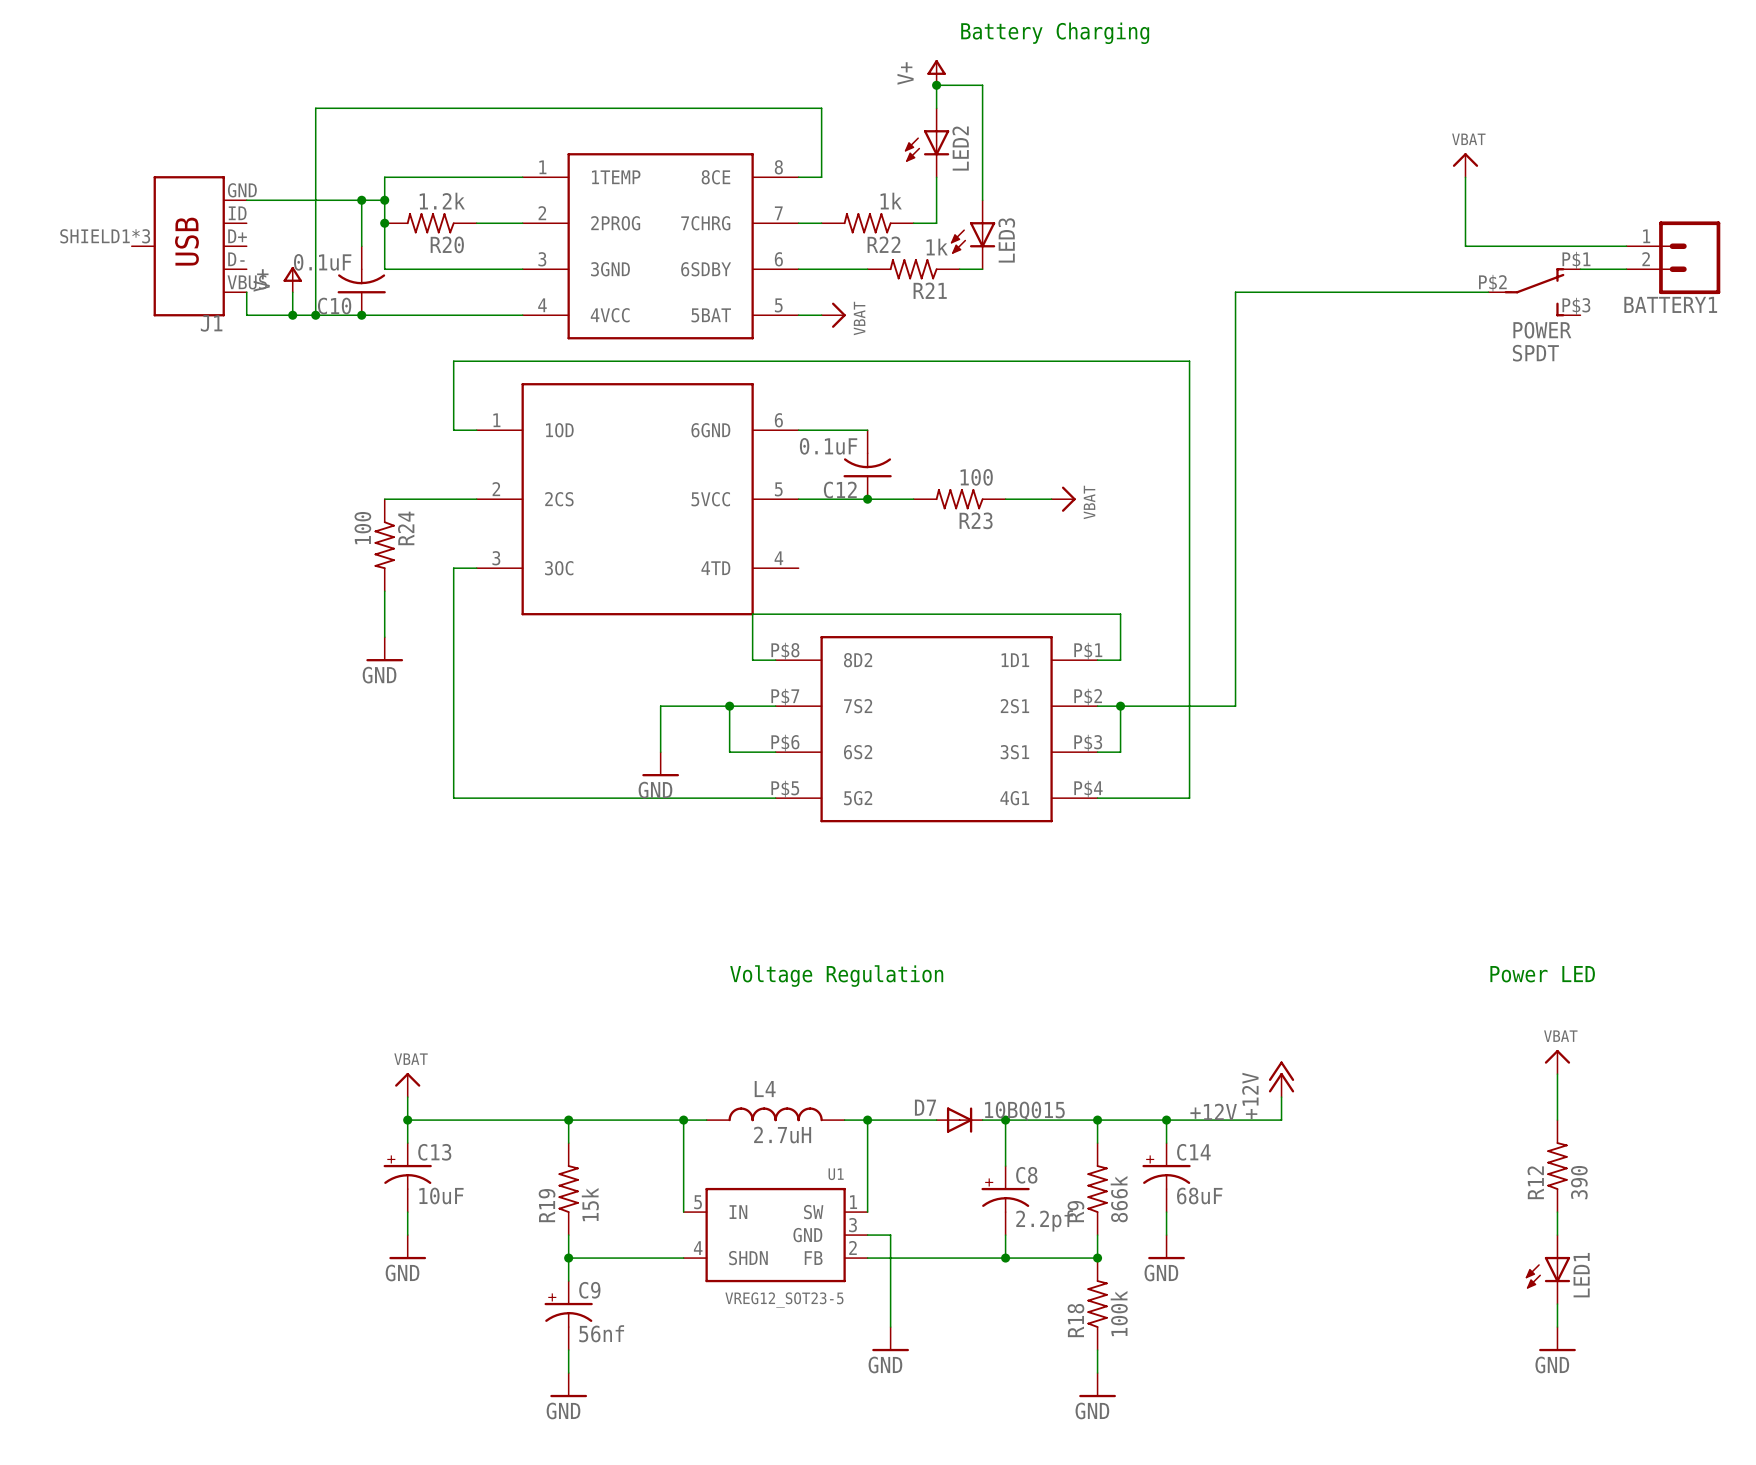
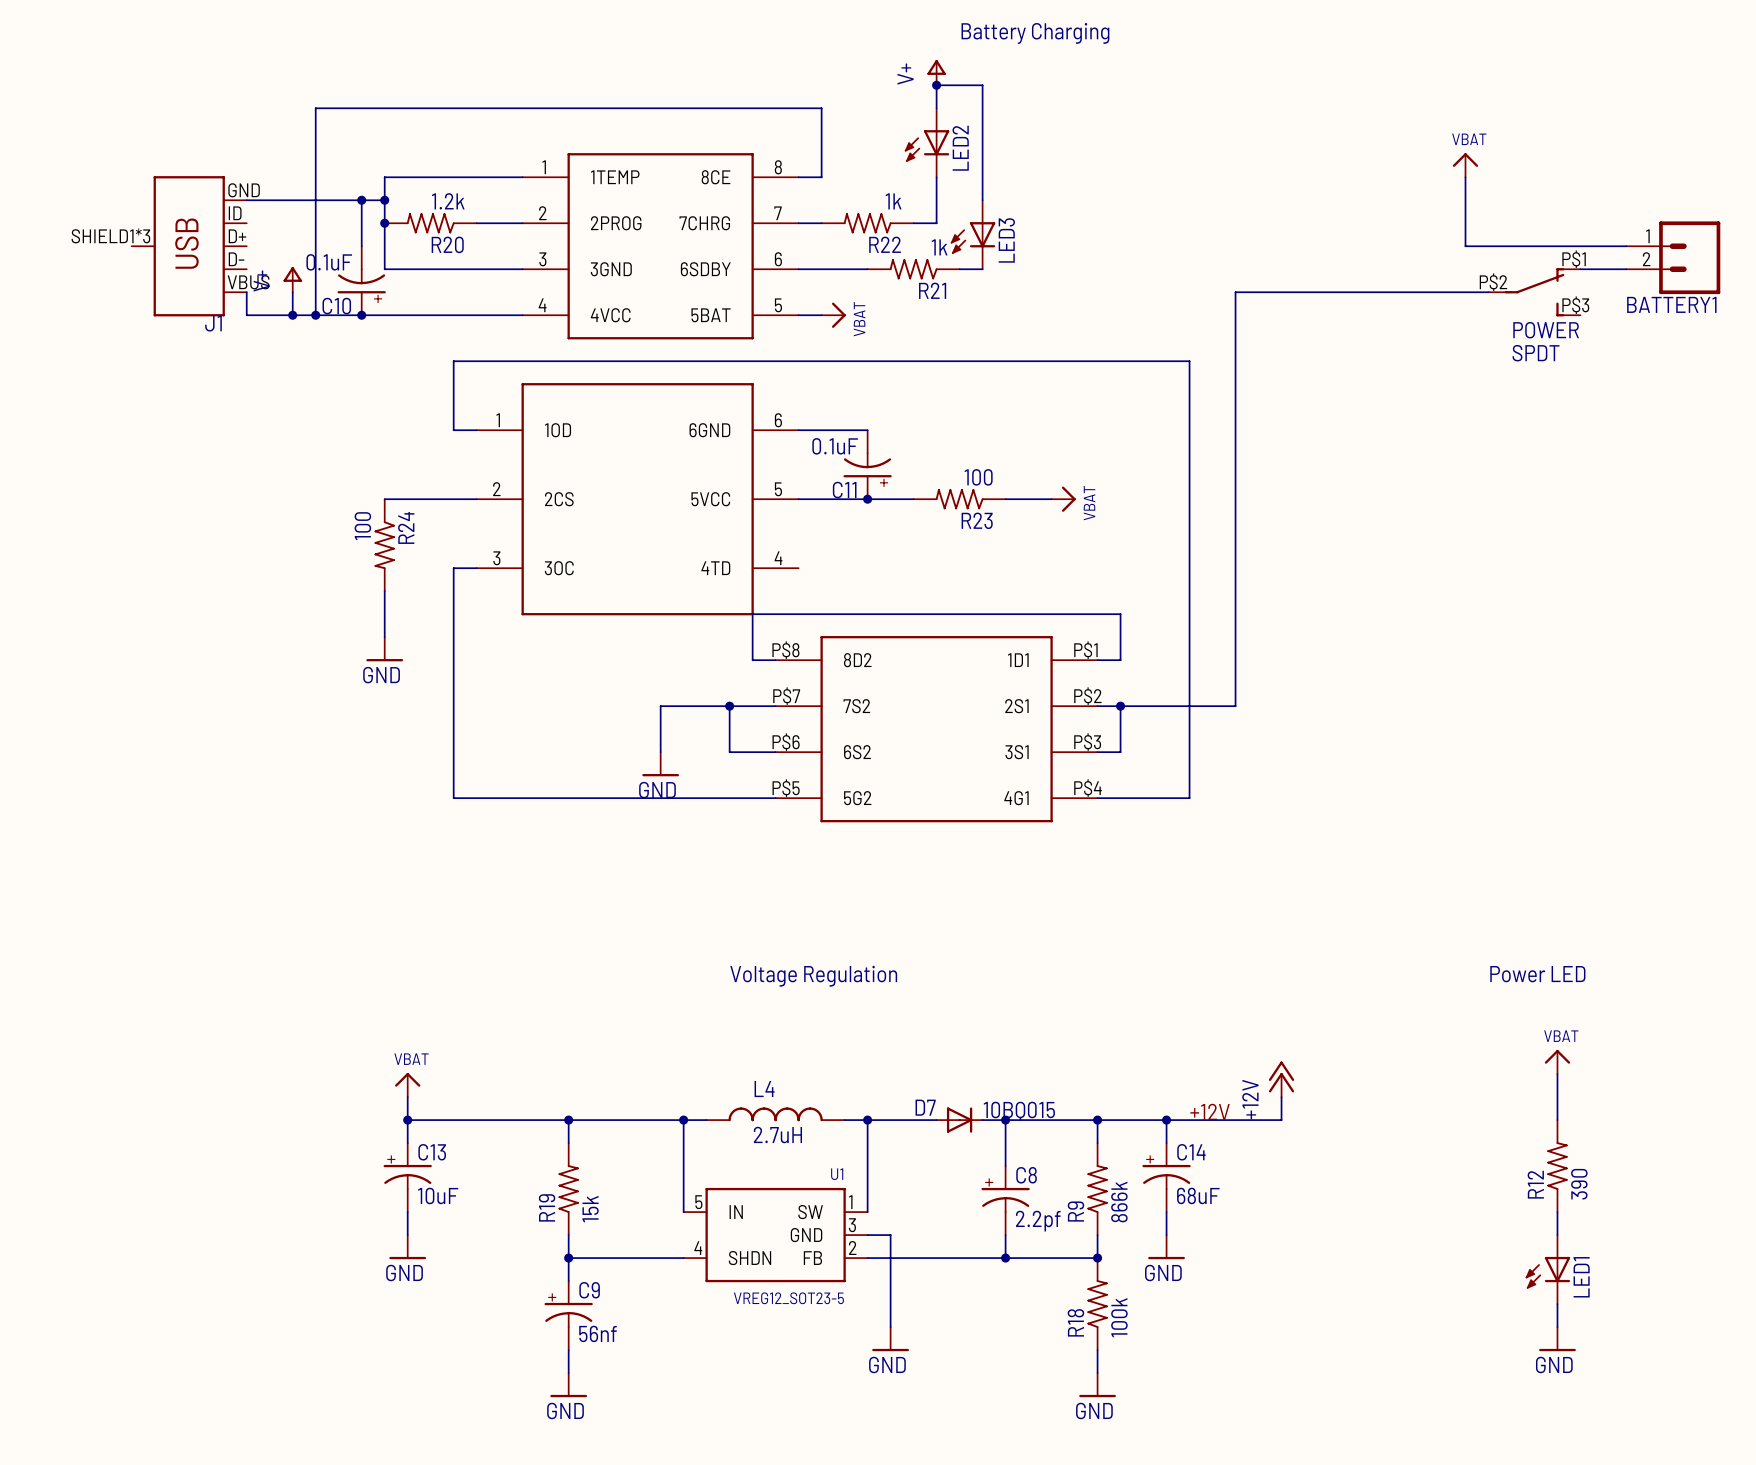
C10 symbol: [337, 246, 386, 316] -> [337, 246, 386, 316]
C12: 0.1uF (867, 464) -> none
C11: none -> 0.1uF (867, 464)

